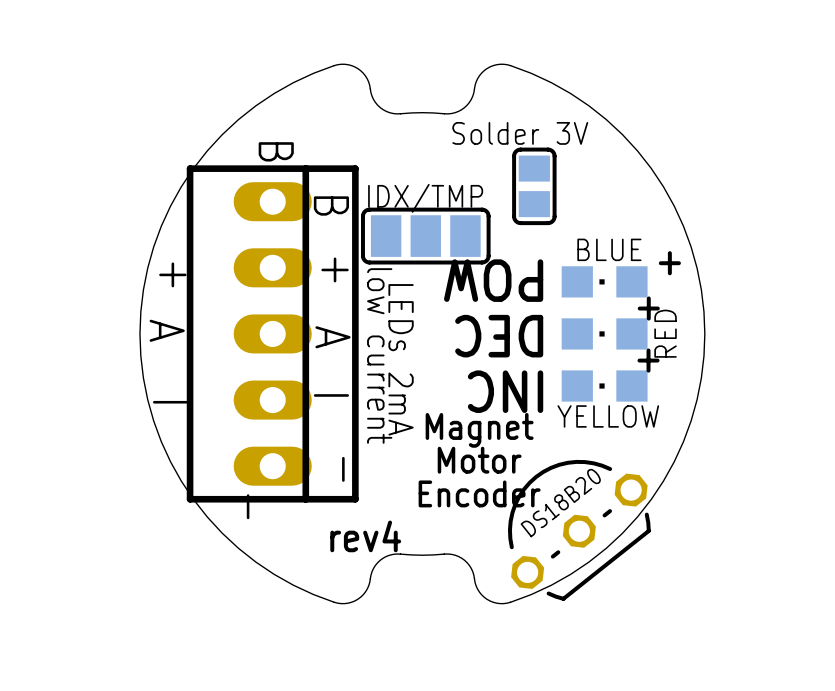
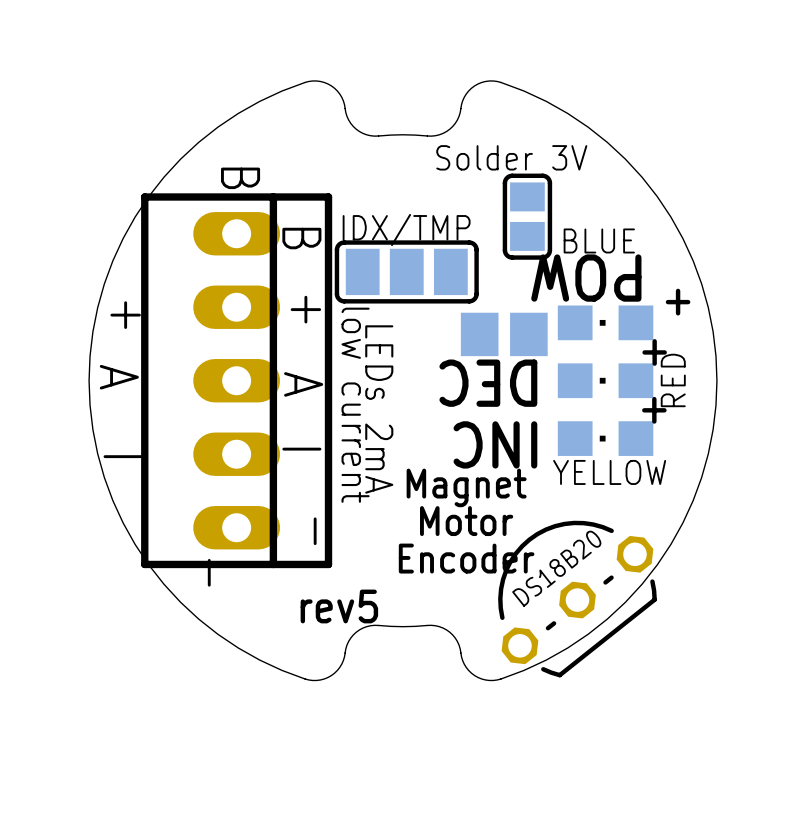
text position: BLUE (609, 249) -> BLUE (599, 240)
text position: POW (493, 280) -> POW (586, 278)
part: none -> (504, 334)
text: rev4 (365, 536) -> rev5 (339, 606)

